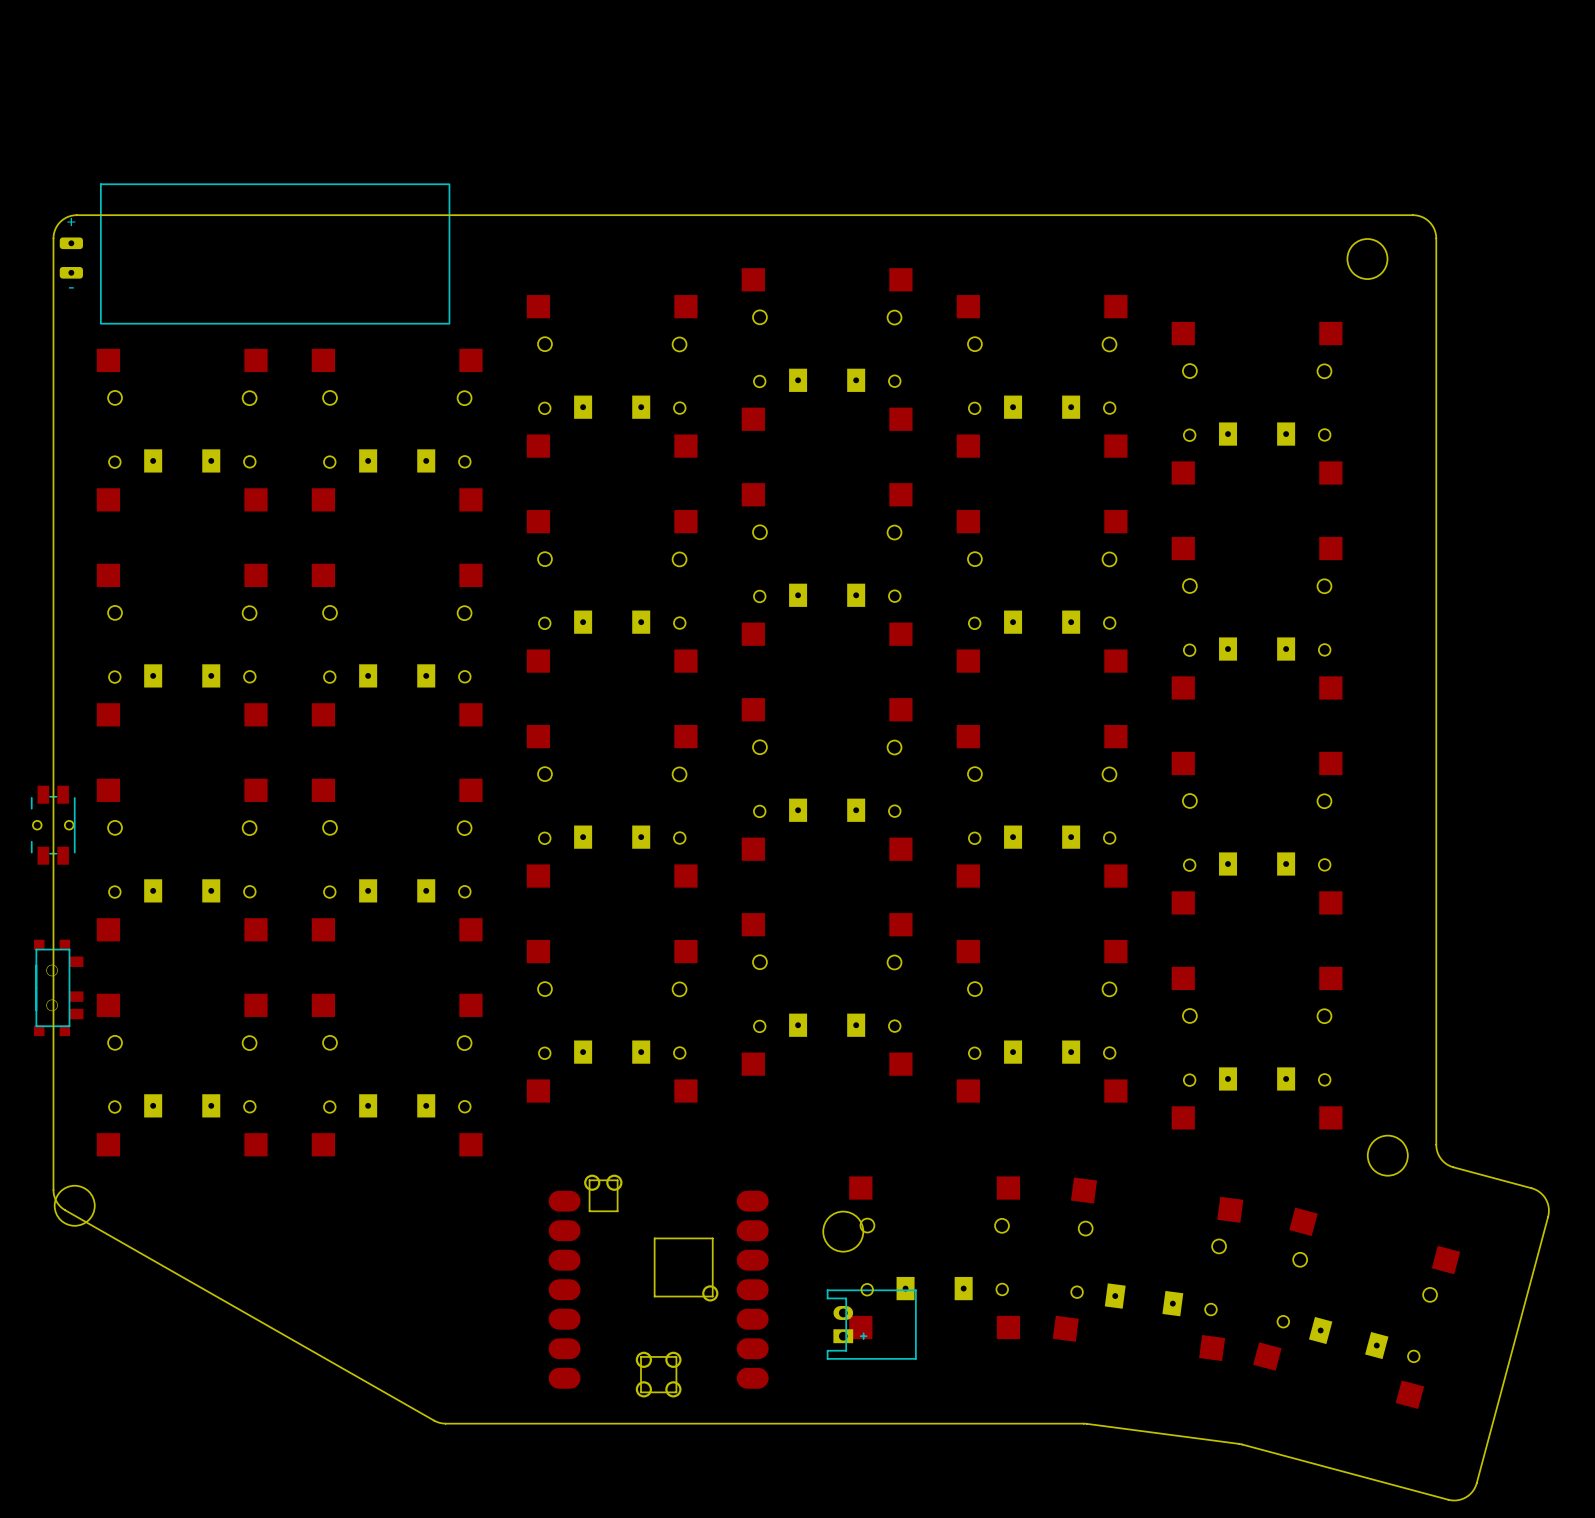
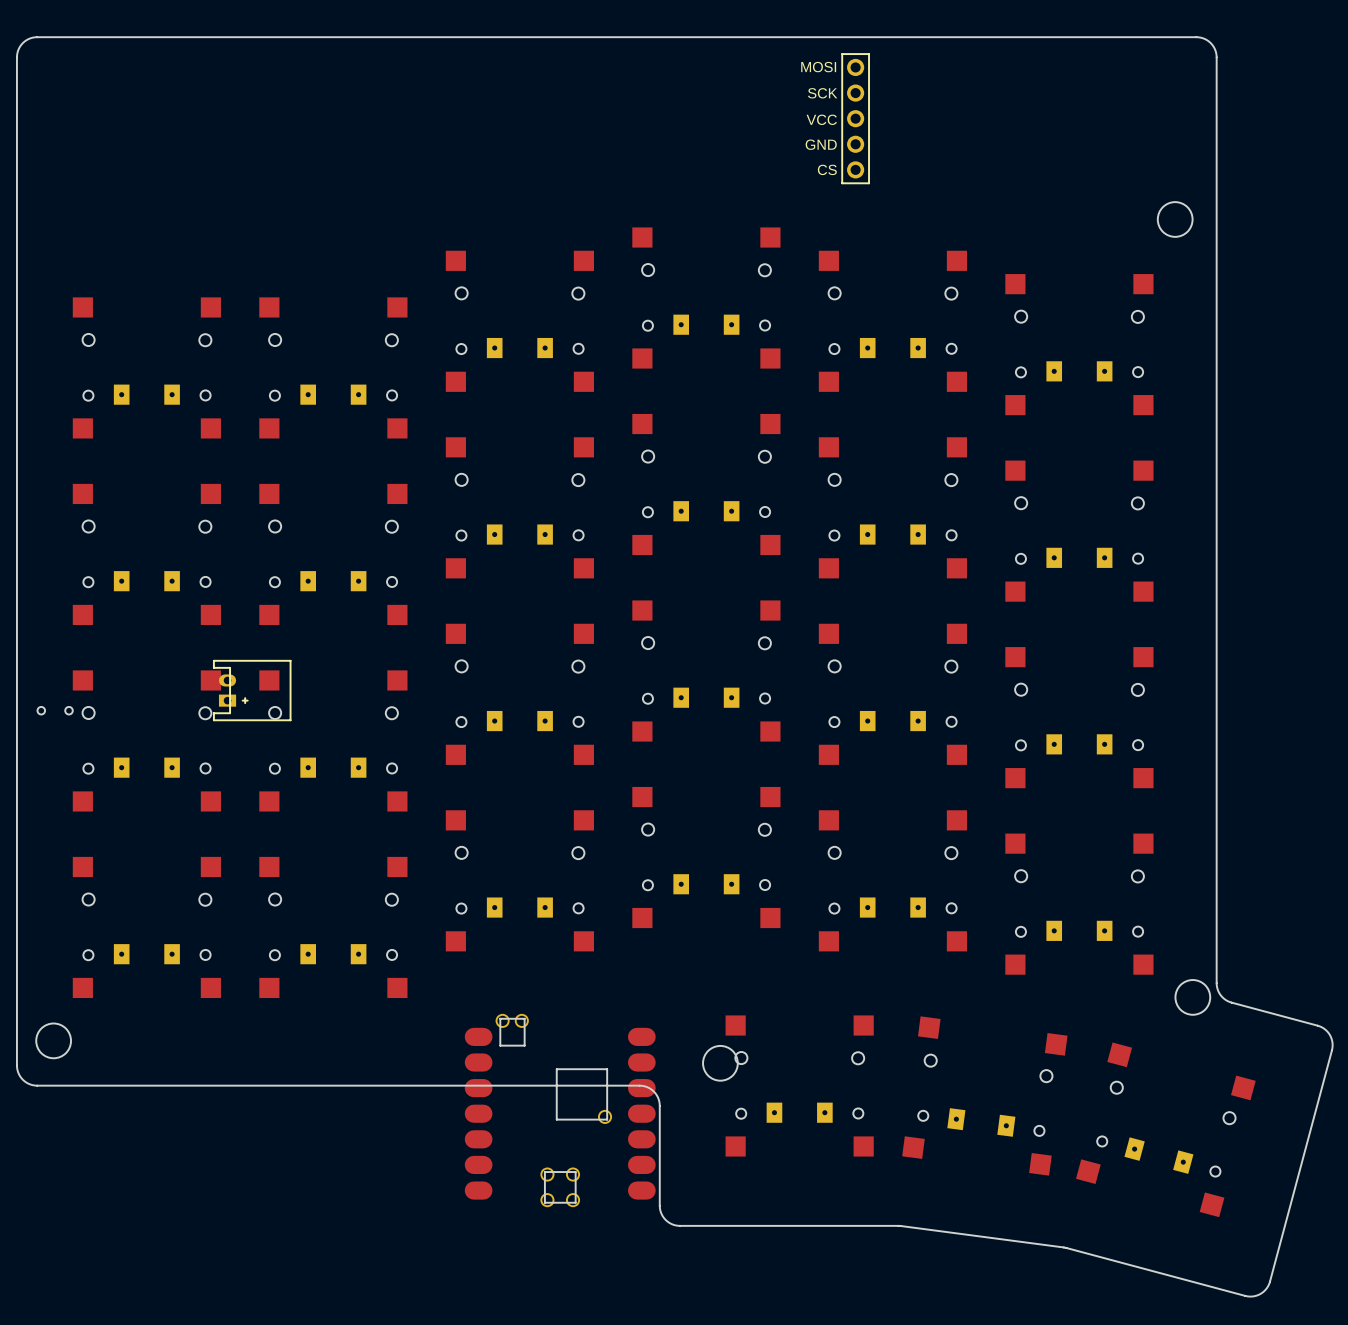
part: none -> (855, 118)
part: (254, 253) -> none
part: none -> (252, 690)
part: (53, 825) -> none
part: none -> (55, 710)
part: (58, 987) -> none
board edge: (1453, 1167) (1441, 1159) (1436, 1144) (1436, 238) (1432, 226) (1425, 218) (1413, 215) (76, 215) (62, 220) (55, 228) (53, 238) (53, 1190) (55, 1199) (59, 1205) (439, 1422) (1086, 1423) -> (1249, 1007) (1225, 999) (1218, 991) (1216, 983) (1216, 57) (1214, 48) (1209, 41) (1196, 37) (37, 37) (24, 41) (18, 48) (16, 57) (16, 1065) (21, 1078) (28, 1083) (37, 1085) (641, 1085) (653, 1091) (659, 1101) (659, 1207) (664, 1218) (671, 1223) (679, 1225) (898, 1225) (931, 1230)
part: (871, 1324) -> none

